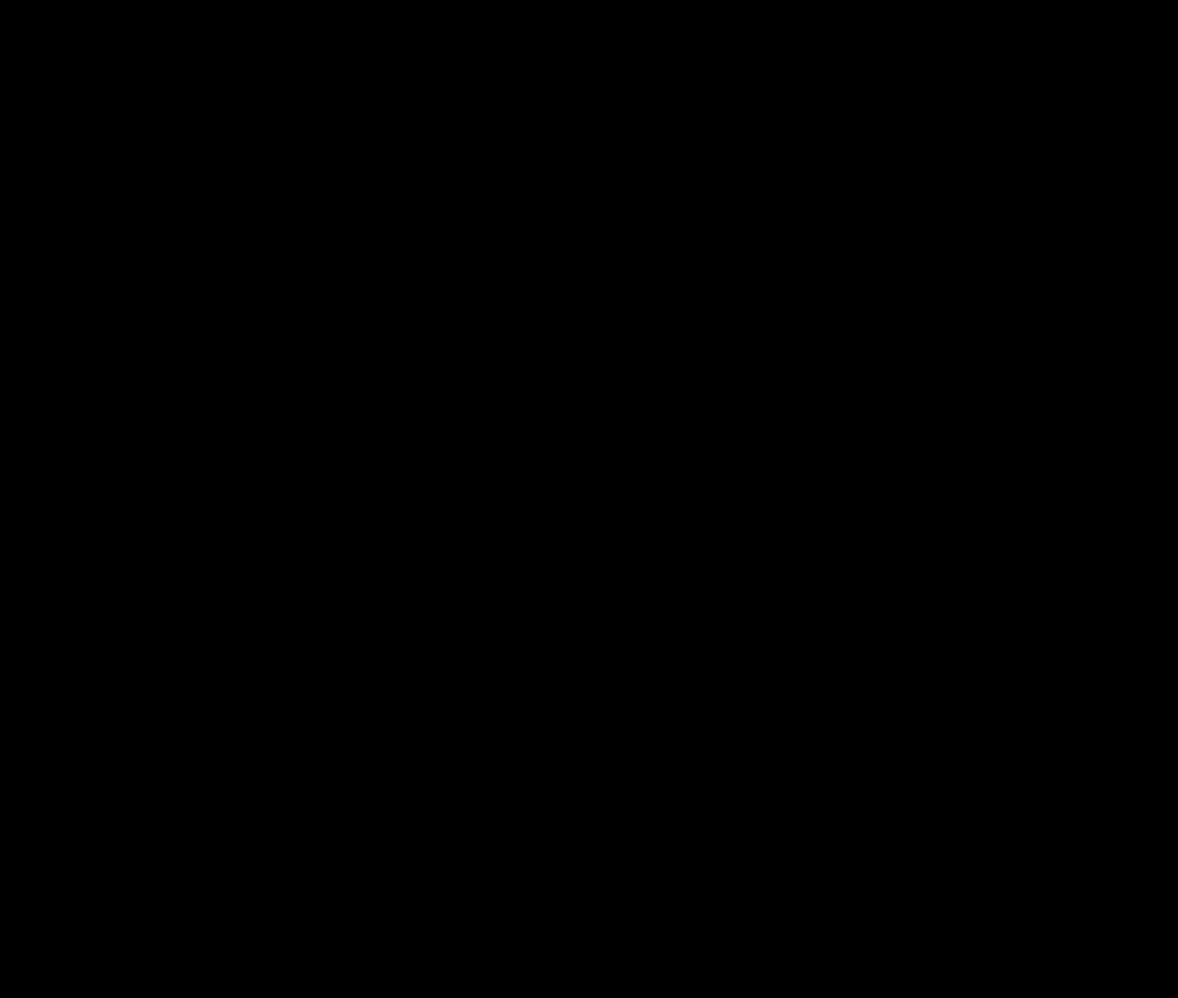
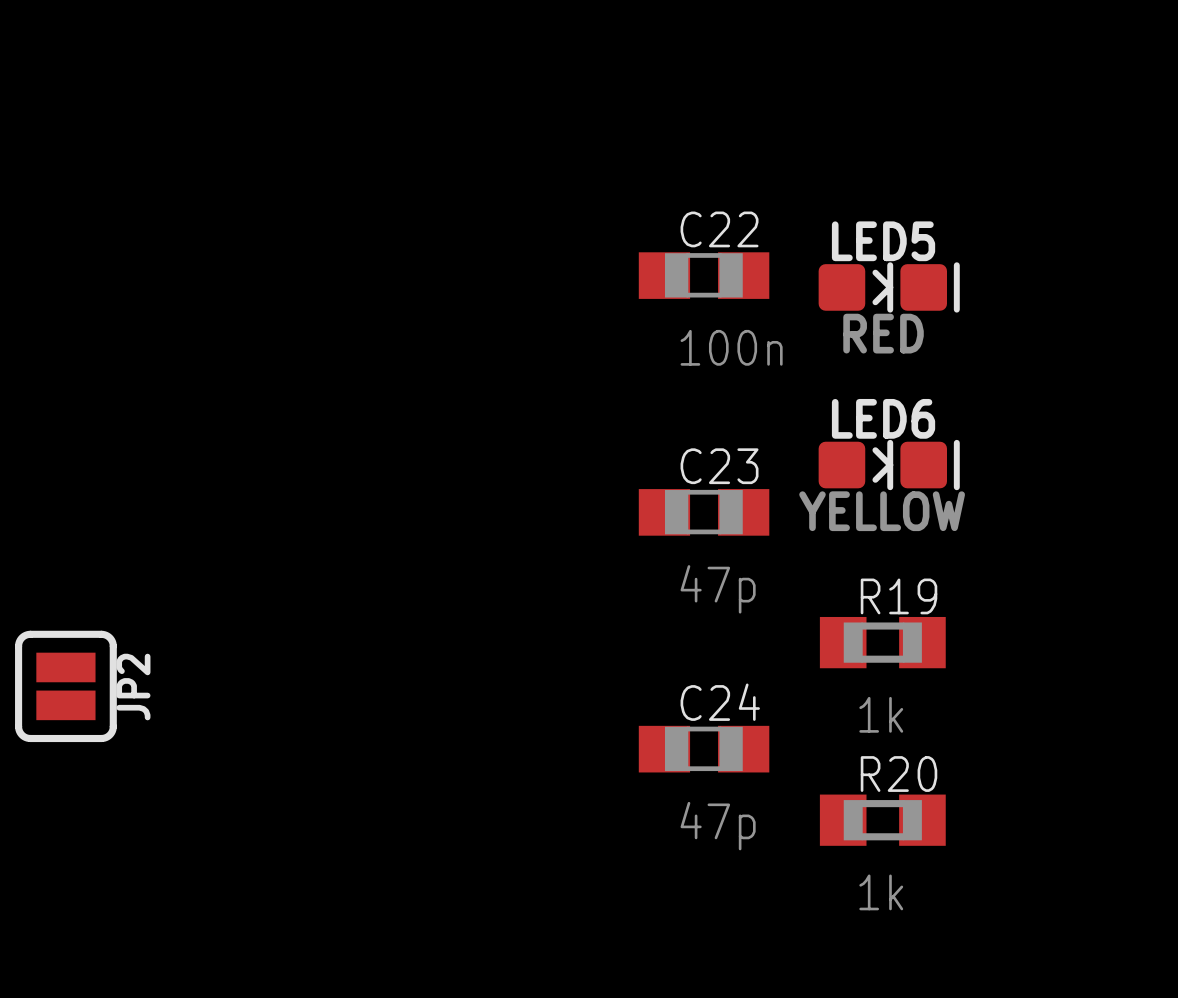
C22: none -> 100n (704, 275)
LED5: none -> RED (889, 287)
LED6: none -> YELLOW (889, 465)
C23: none -> 47p (704, 512)
R19: none -> 1k (882, 642)
JP2: none -> (65, 686)
C24: none -> 47p (704, 749)
R20: none -> 1k (882, 820)

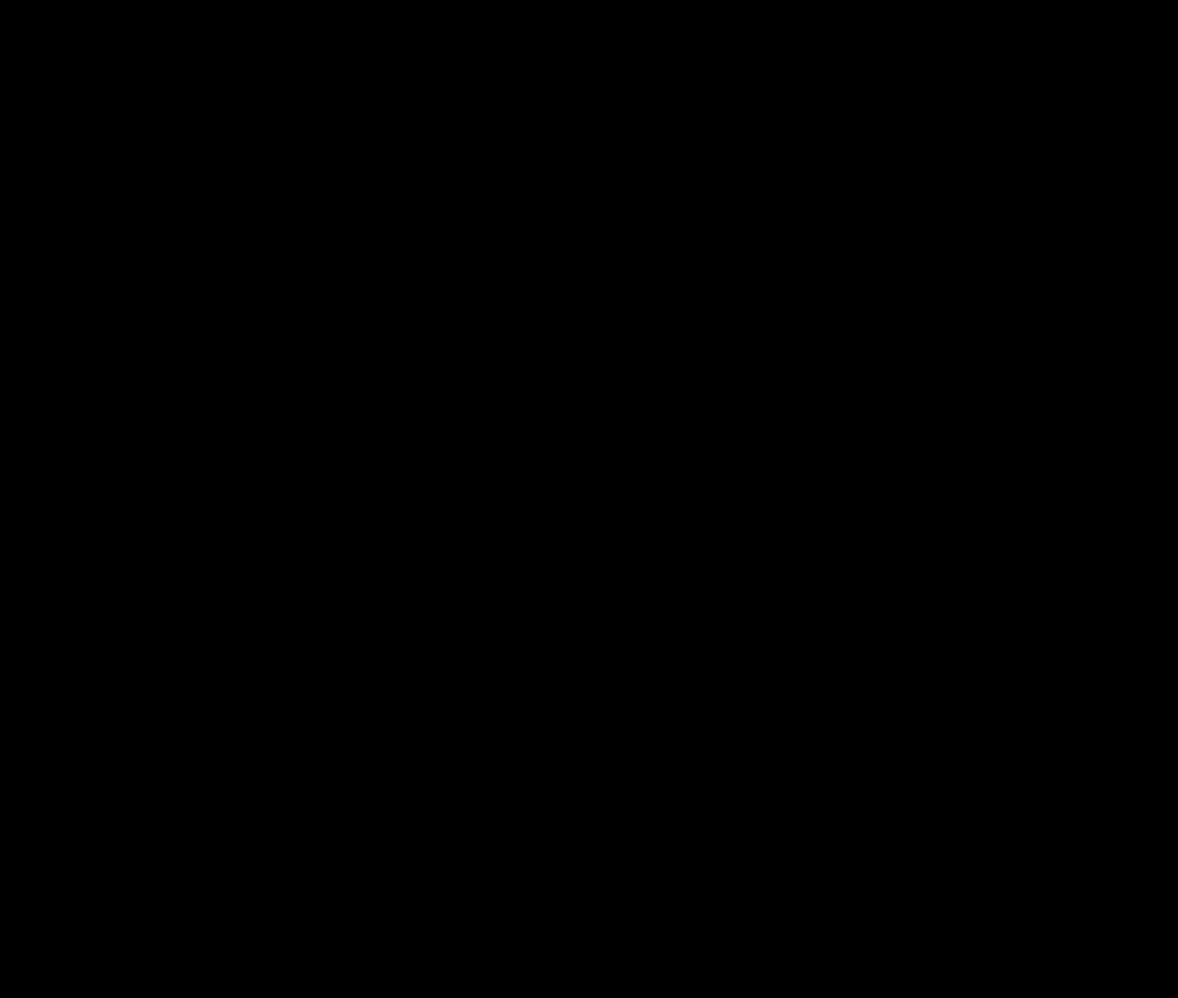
C22: 100n (704, 275) -> none
LED5: RED (889, 287) -> none
LED6: YELLOW (889, 465) -> none
C23: 47p (704, 512) -> none
R19: 1k (882, 642) -> none
JP2: (65, 686) -> none
C24: 47p (704, 749) -> none
R20: 1k (882, 820) -> none

